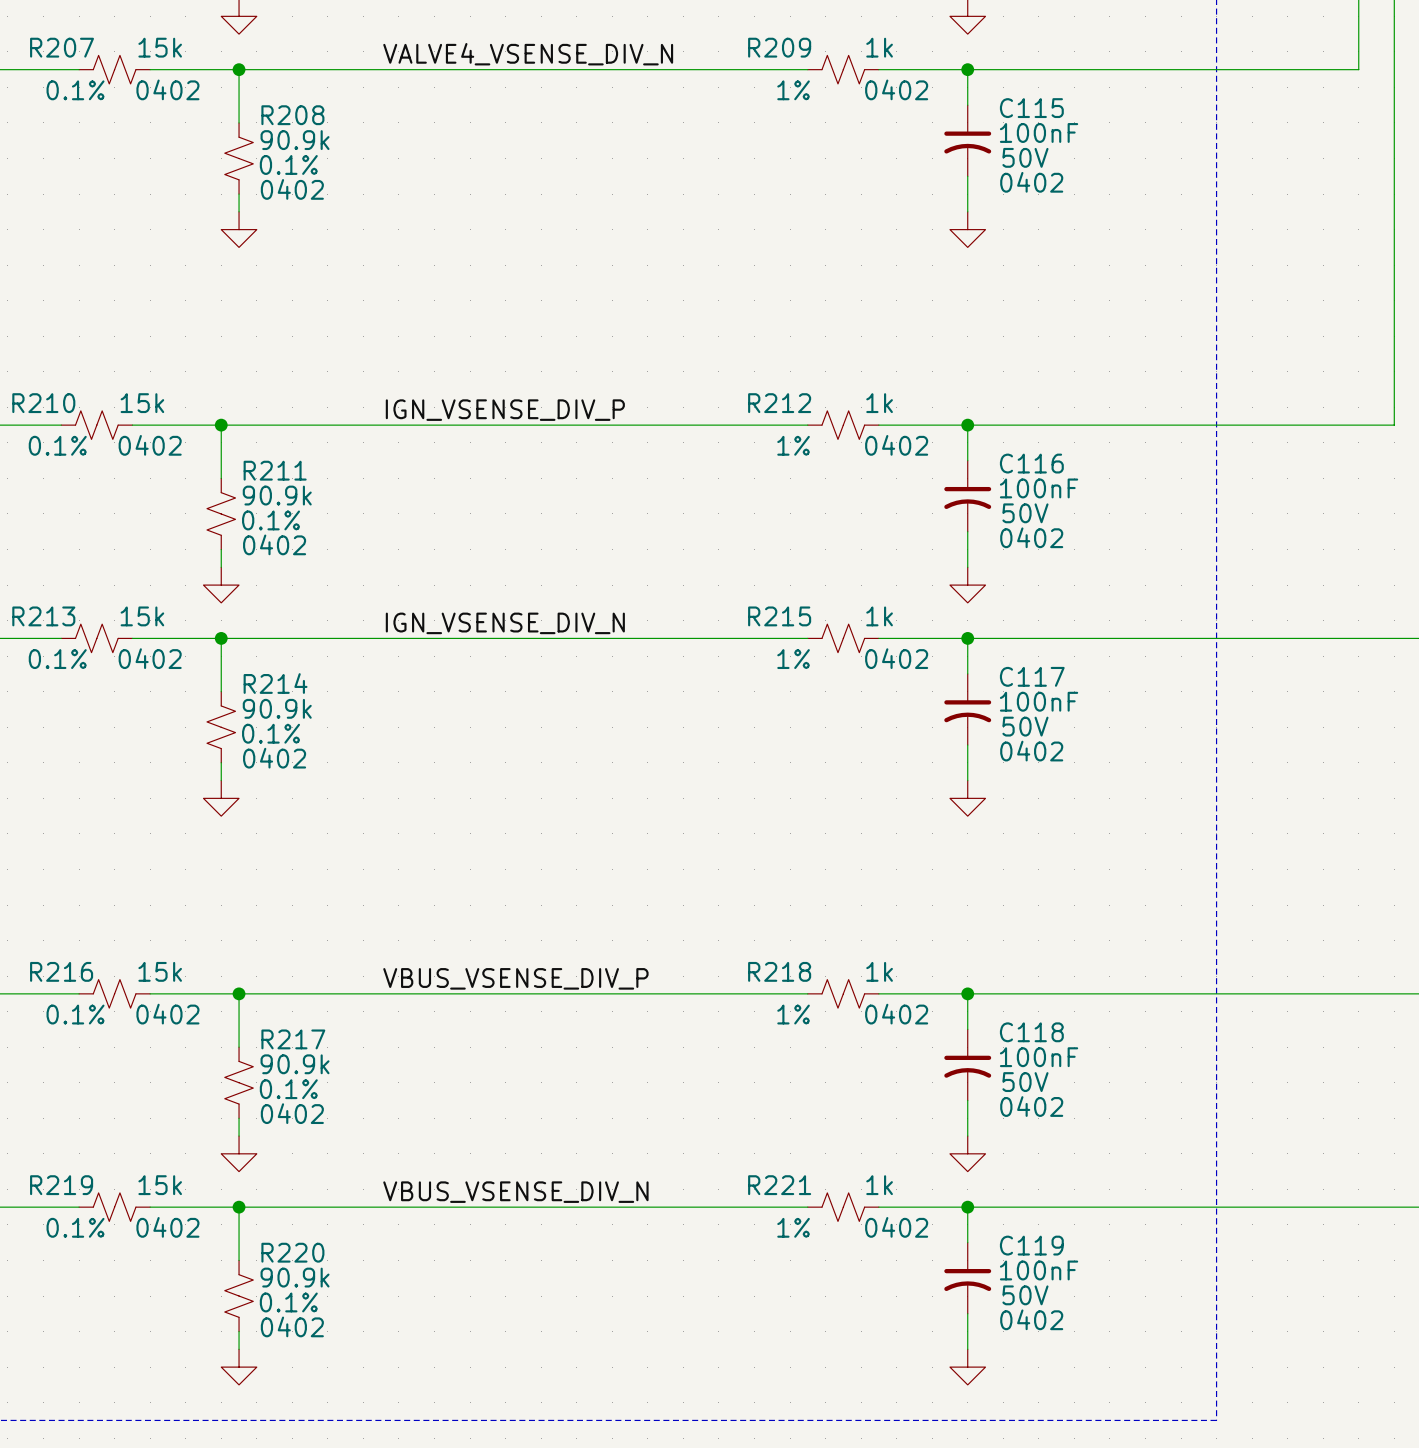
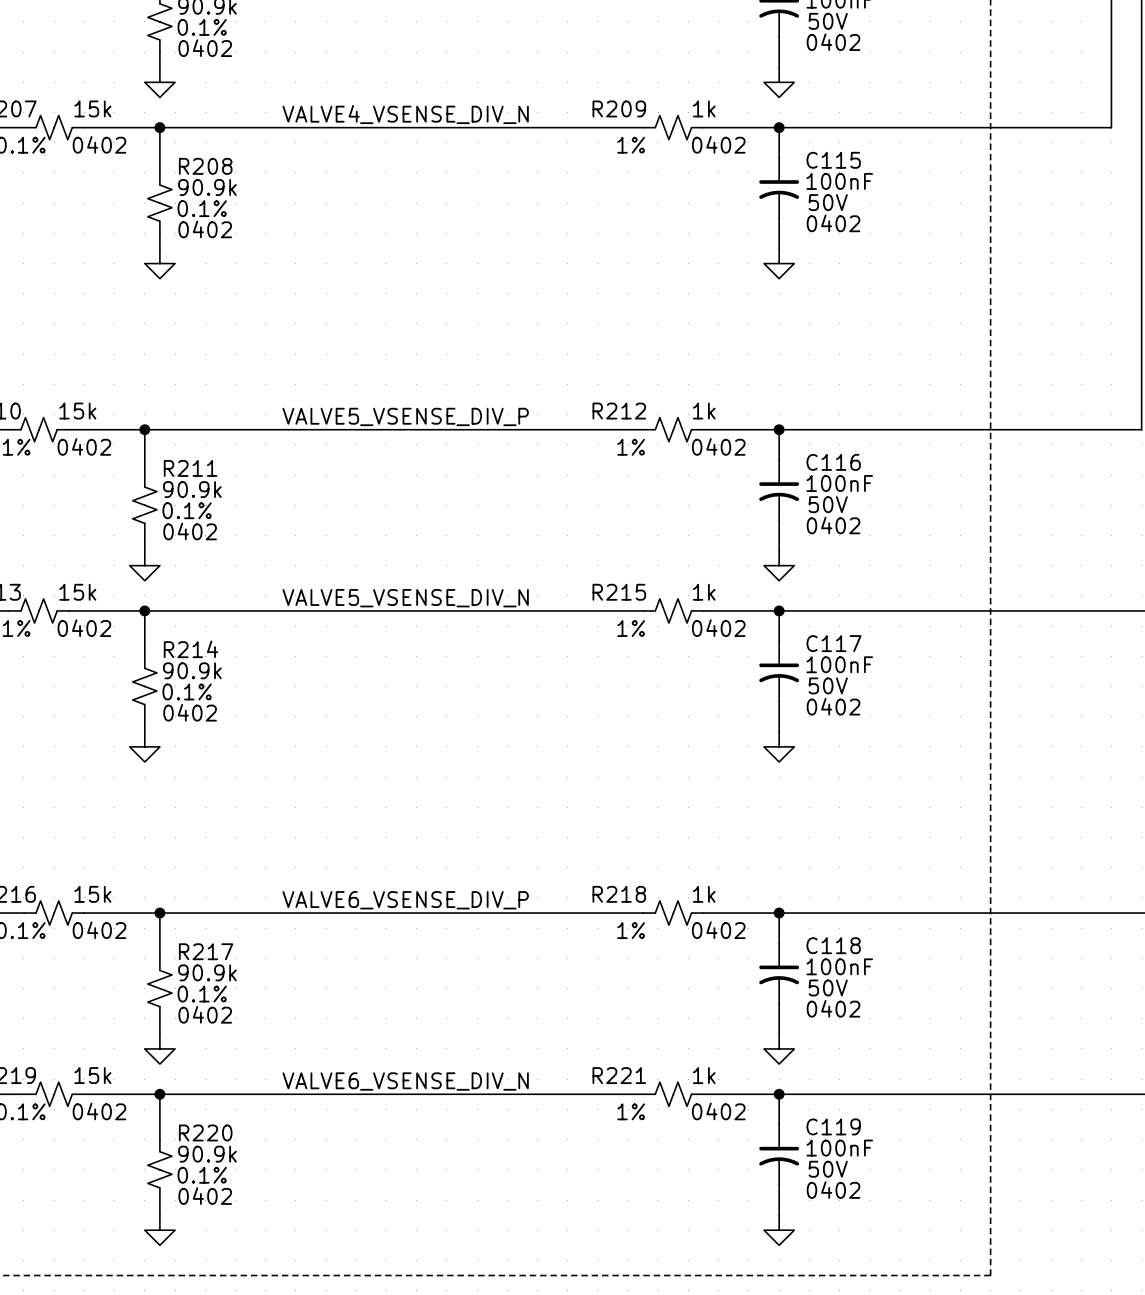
label: IGN_VSENSE_DIV_P (505, 410) -> VALVE5_VSENSE_DIV_P (405, 416)
label: IGN_VSENSE_DIV_N (505, 623) -> VALVE5_VSENSE_DIV_N (405, 598)
label: VBUS_VSENSE_DIV_P (515, 978) -> VALVE6_VSENSE_DIV_P (405, 900)
label: VBUS_VSENSE_DIV_N (515, 1192) -> VALVE6_VSENSE_DIV_N (405, 1081)

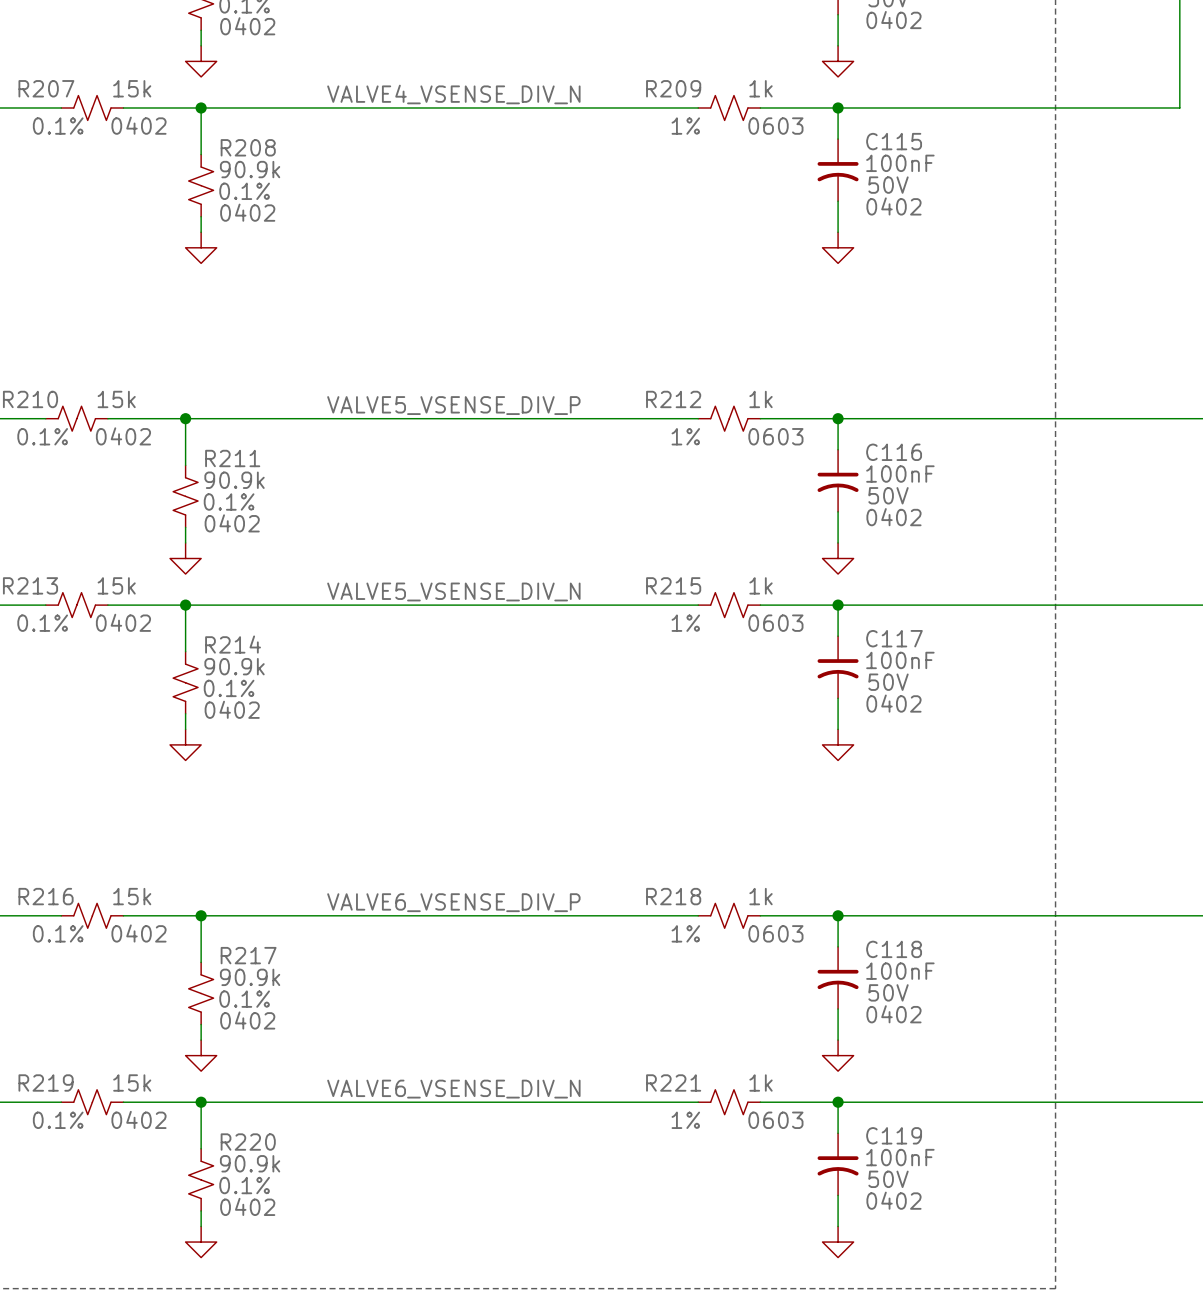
R209 text: 0402 (718, 144) -> 0603 (775, 126)
R212 text: 0402 (718, 446) -> 0603 (775, 436)
R215 text: 0402 (718, 628) -> 0603 (775, 623)
R218 text: 0402 (718, 930) -> 0603 (775, 933)
R221 text: 0402 (718, 1111) -> 0603 (775, 1120)

